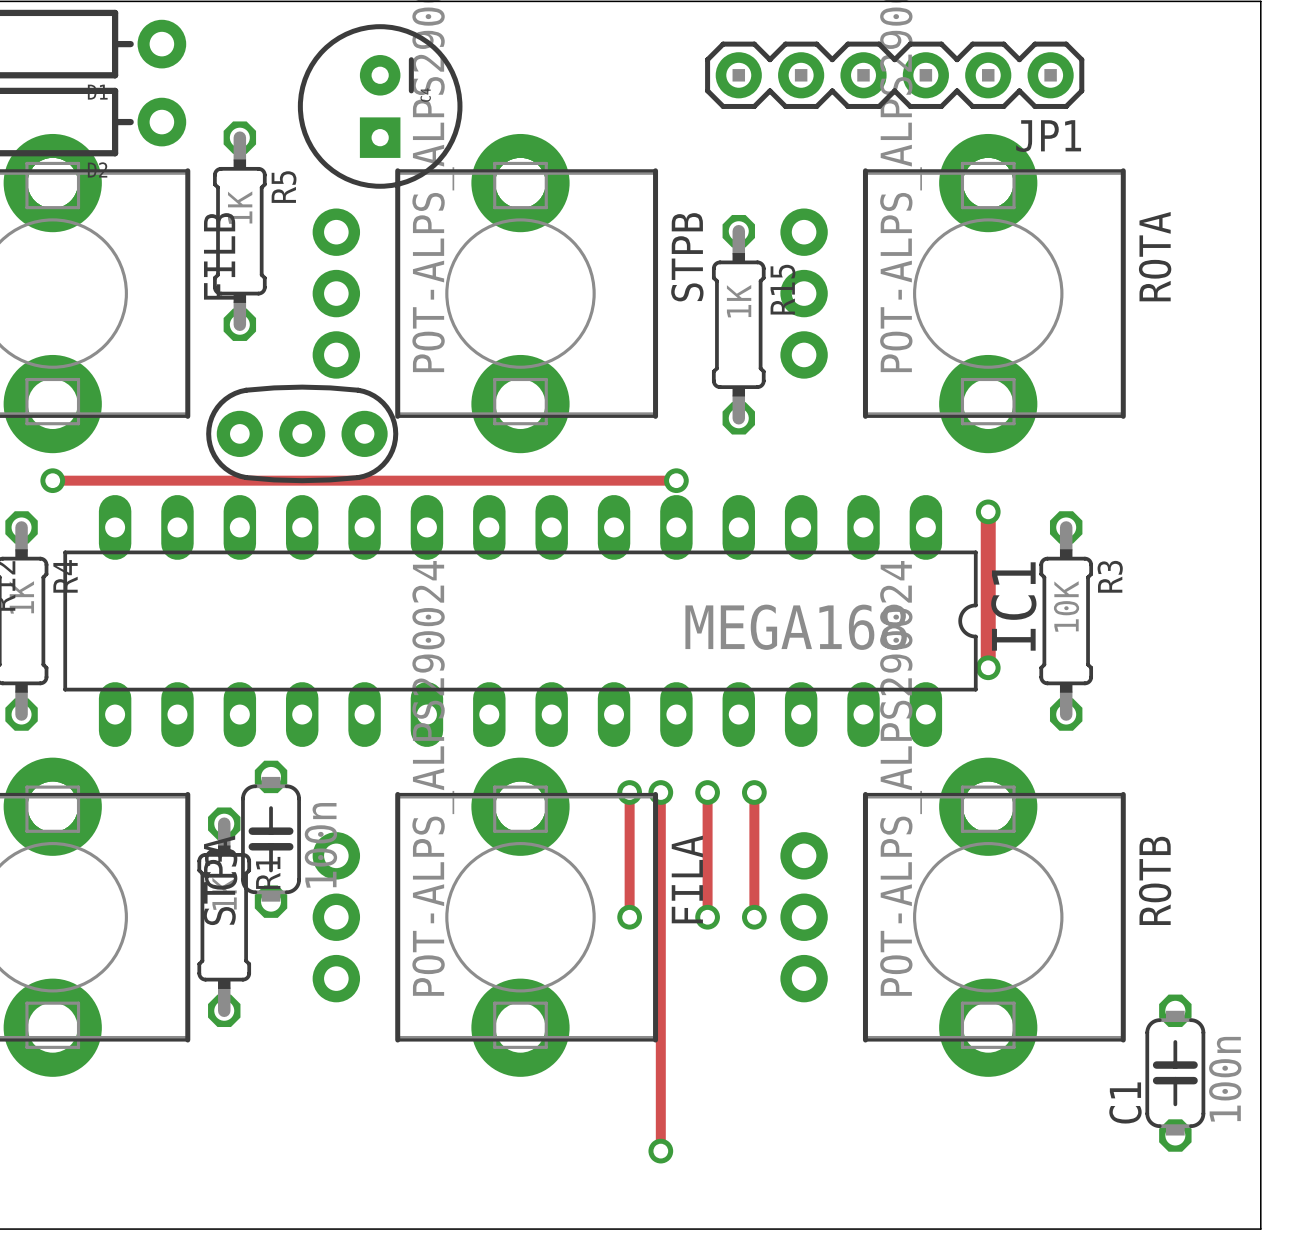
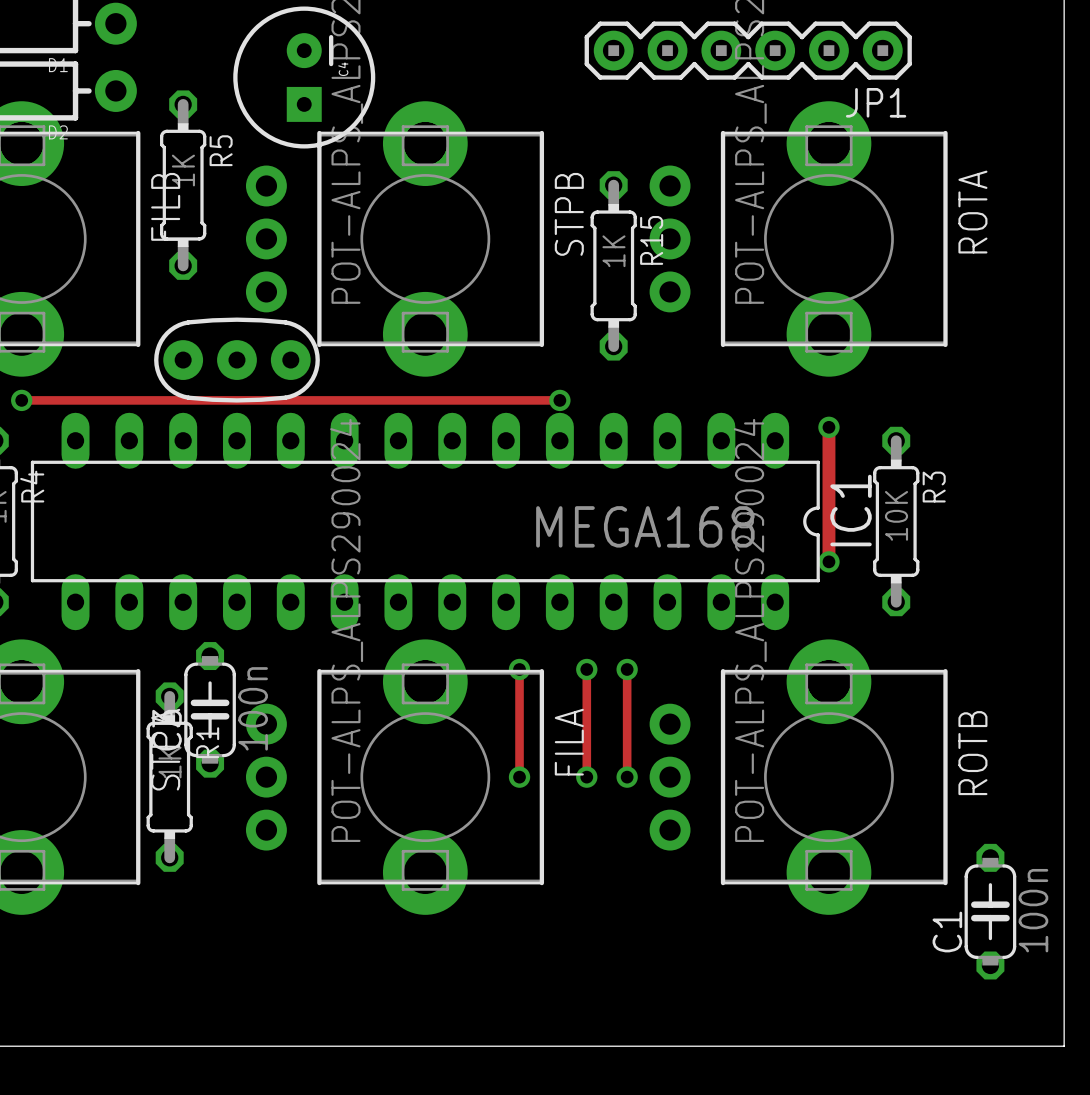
track: (660, 792) (660, 1151) -> none
via: (660, 792) -> none
via: (660, 1151) -> none

